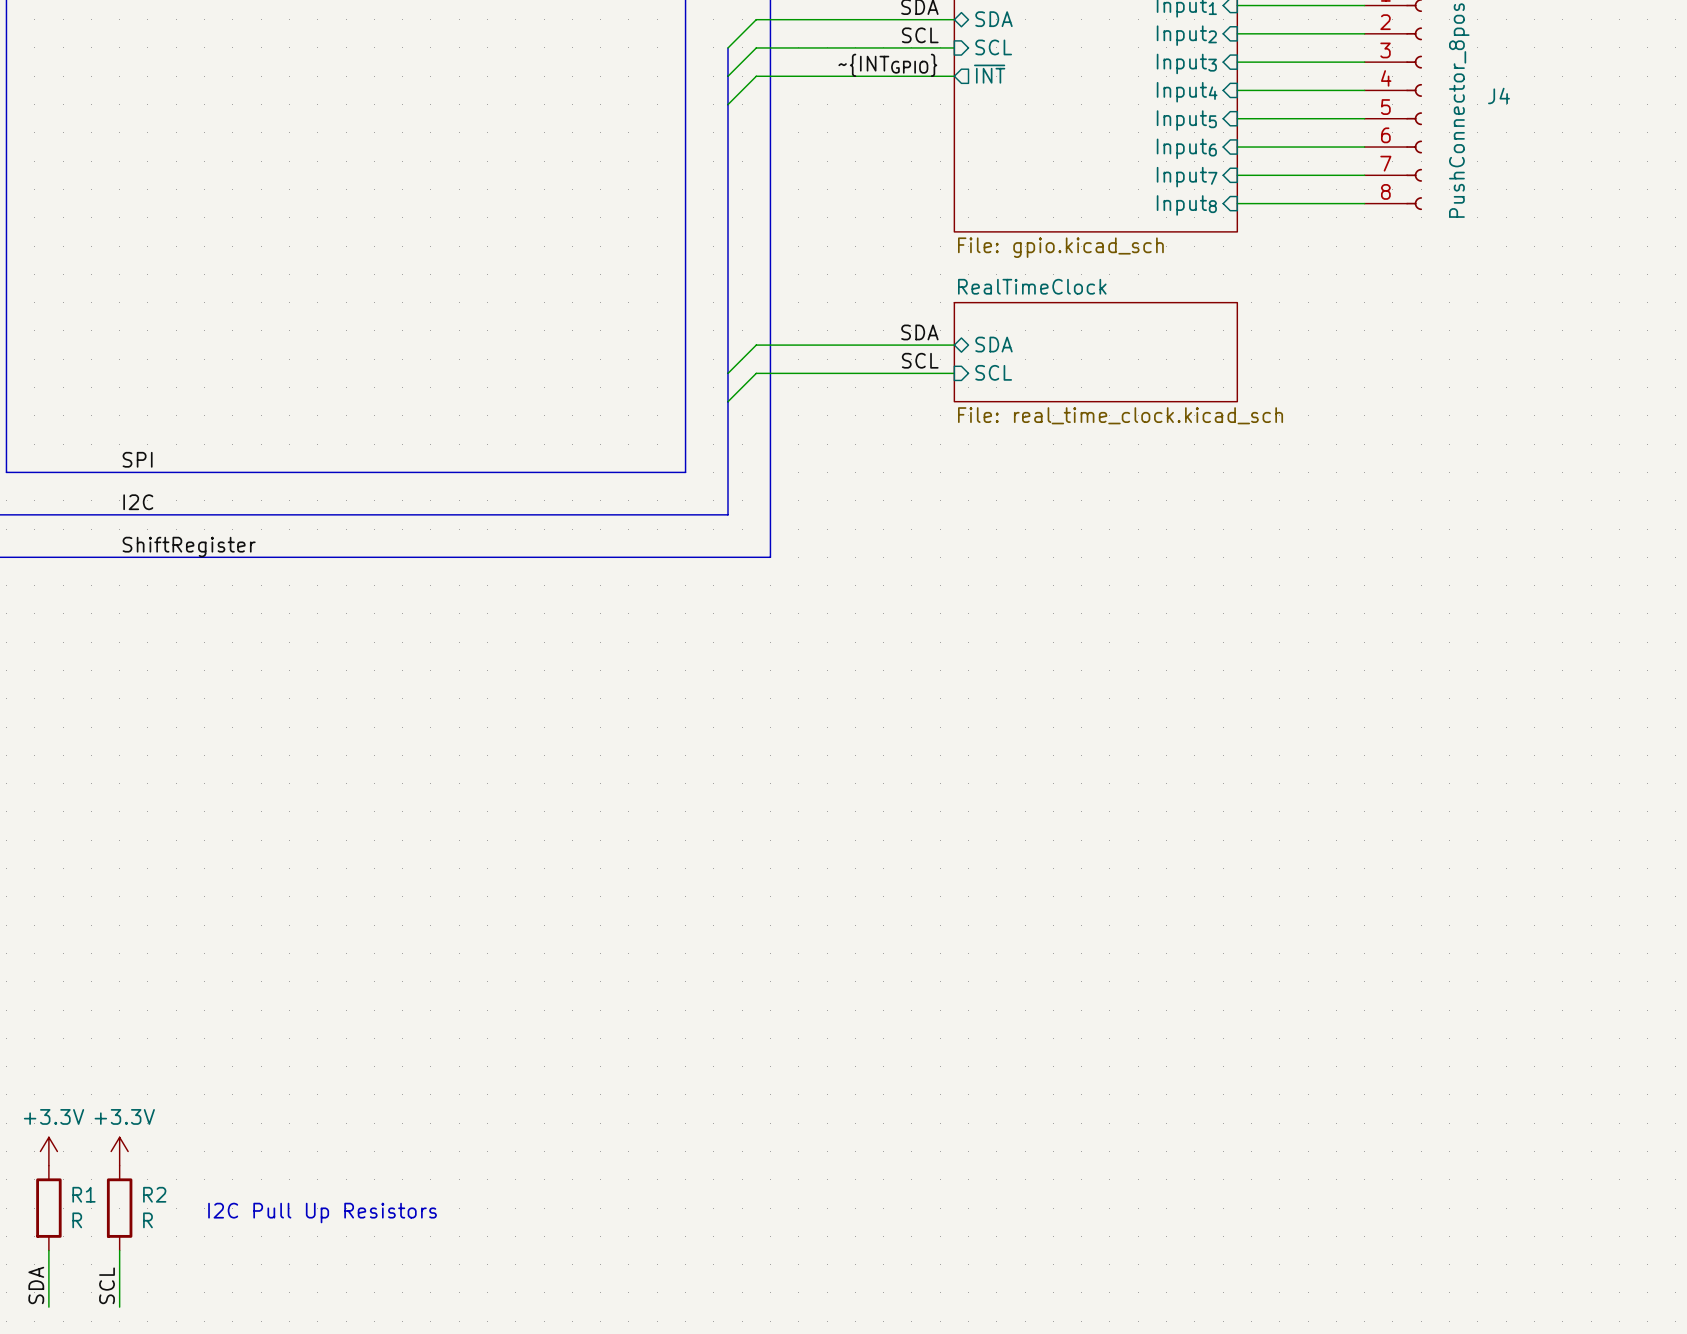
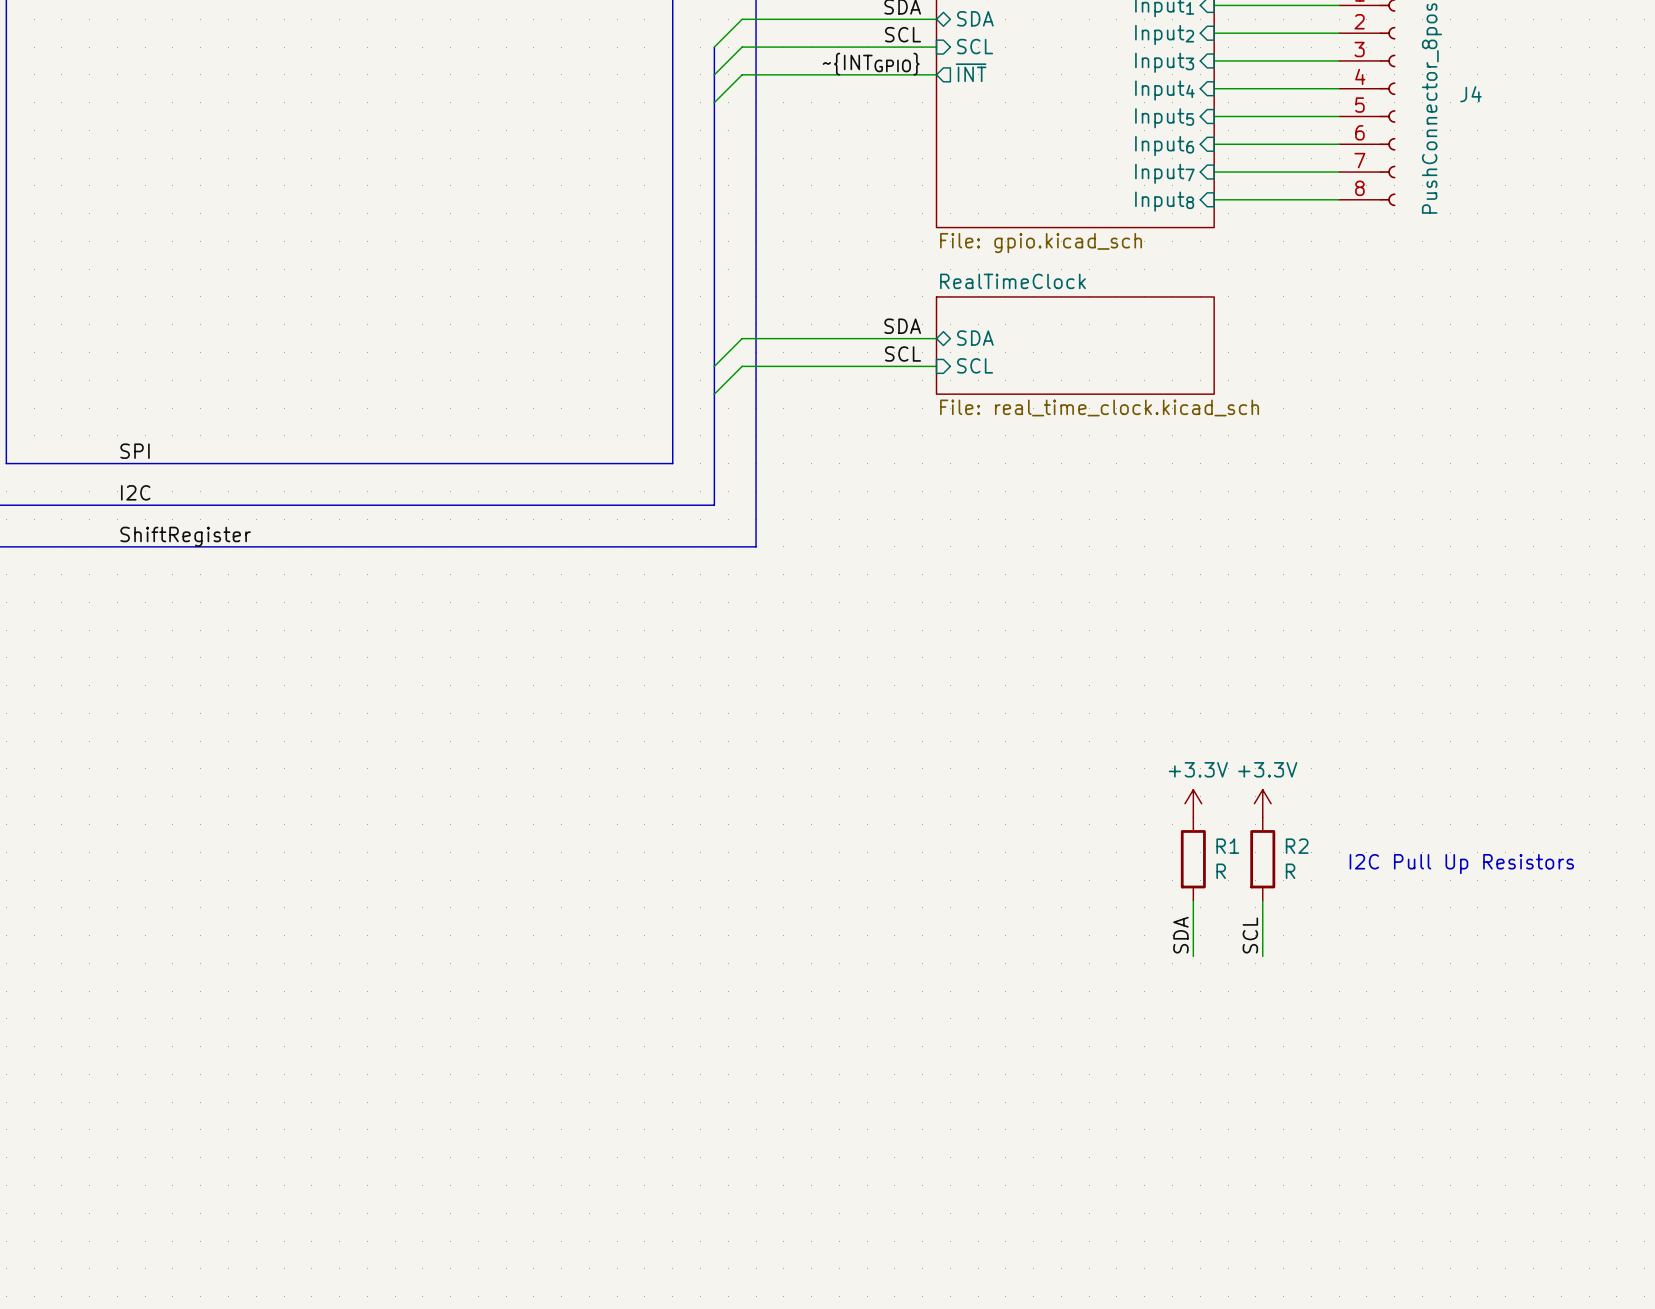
power symbol: none -> +3.3V (1193, 803)
power symbol: none -> +3.3V (1262, 803)
text: none -> I2C Pull Up Resistors (1461, 864)
wire: none -> (1193, 900) (1193, 956)
wire: none -> (1262, 900) (1262, 956)
label: none -> SDA (1180, 935)
label: none -> SCL (1250, 935)
power symbol: +3.3V (48, 1151) -> none
power symbol: +3.3V (119, 1151) -> none
R1 position: (48, 1208) -> (1193, 859)
R2 position: (119, 1208) -> (1262, 859)
text: I2C Pull Up Resistors (322, 1213) -> none
wire: (48, 1250) (48, 1307) -> none
wire: (119, 1250) (119, 1307) -> none
label: SDA (36, 1285) -> none
label: SCL (107, 1285) -> none

